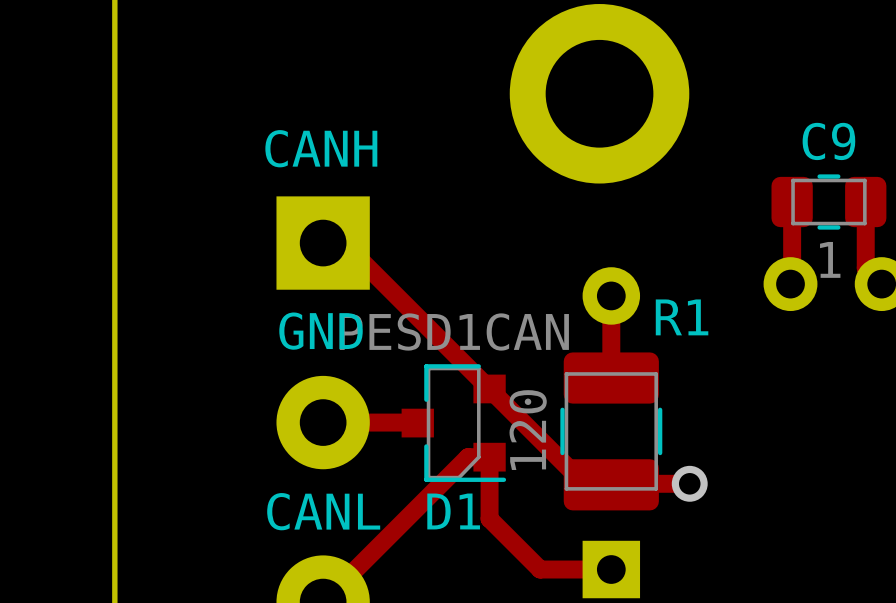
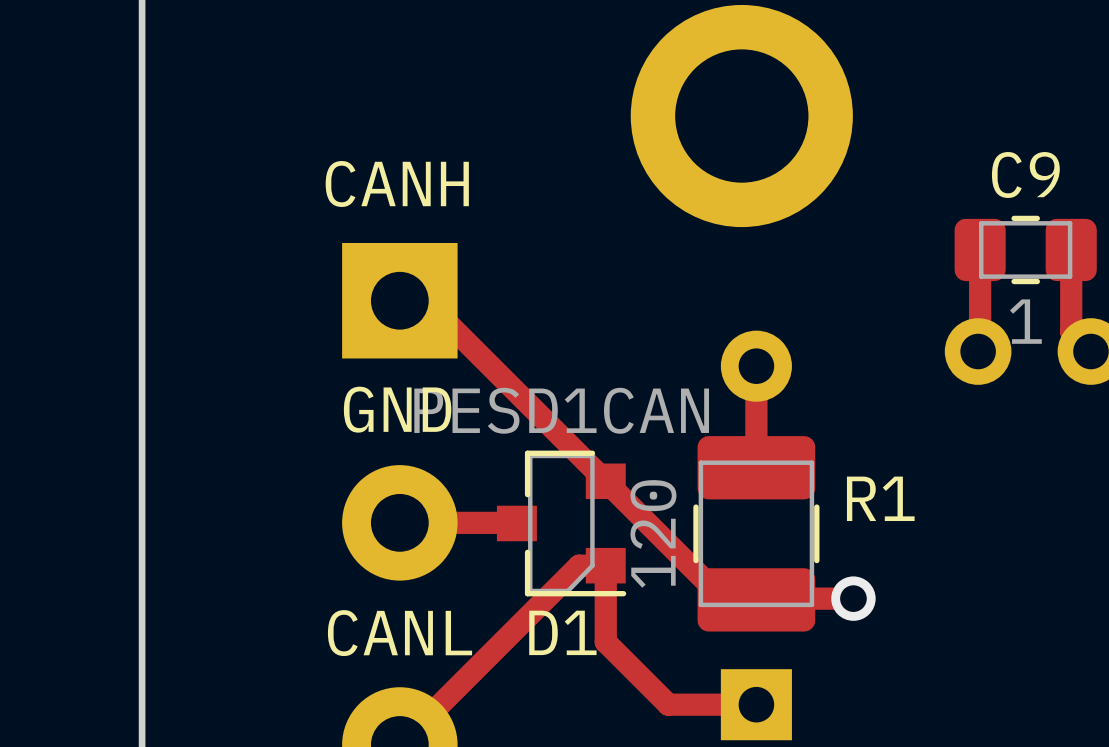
R1 name position: R1 (682, 317) -> R1 (880, 498)

